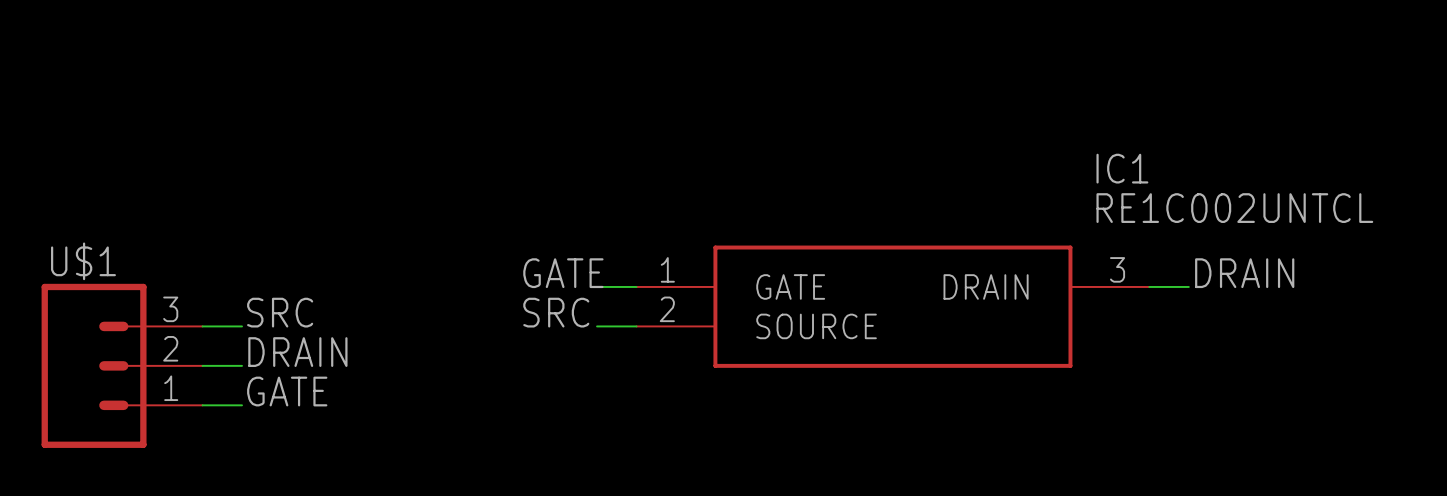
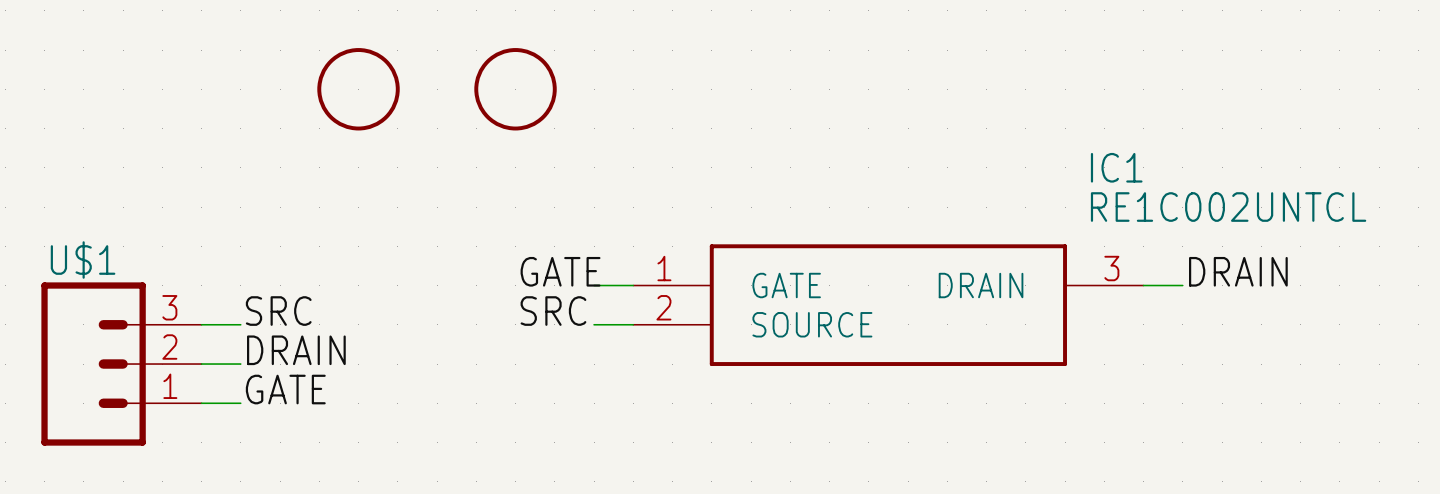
part: none -> (358, 89)
part: none -> (515, 89)

